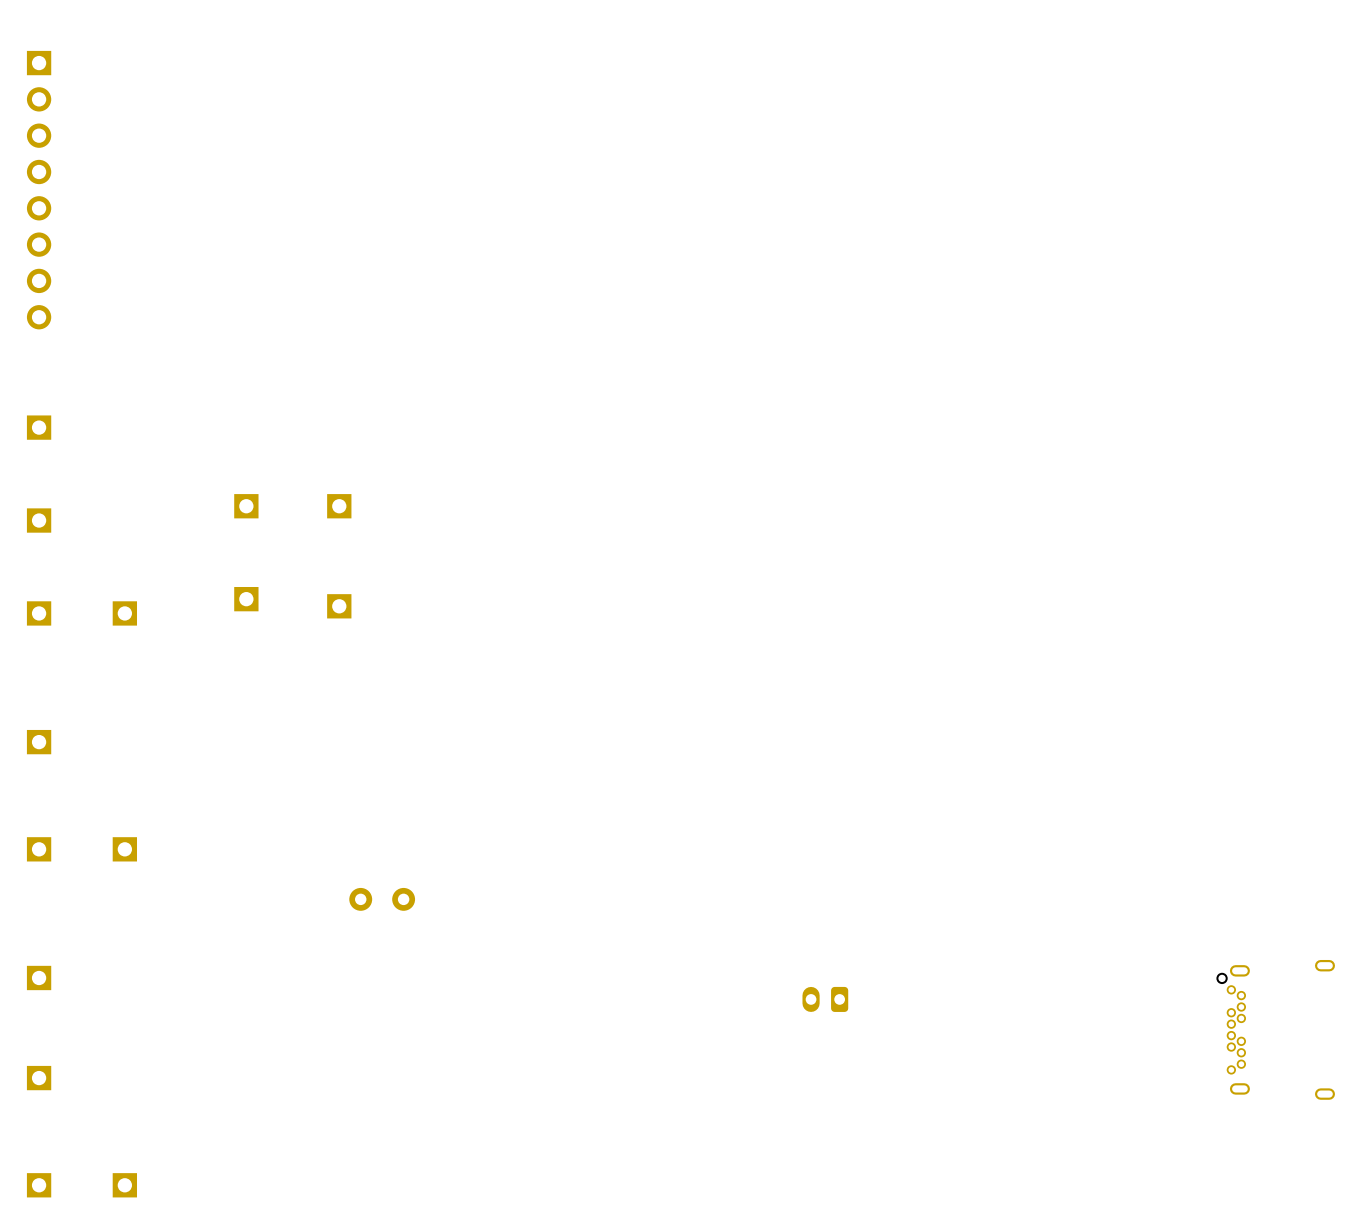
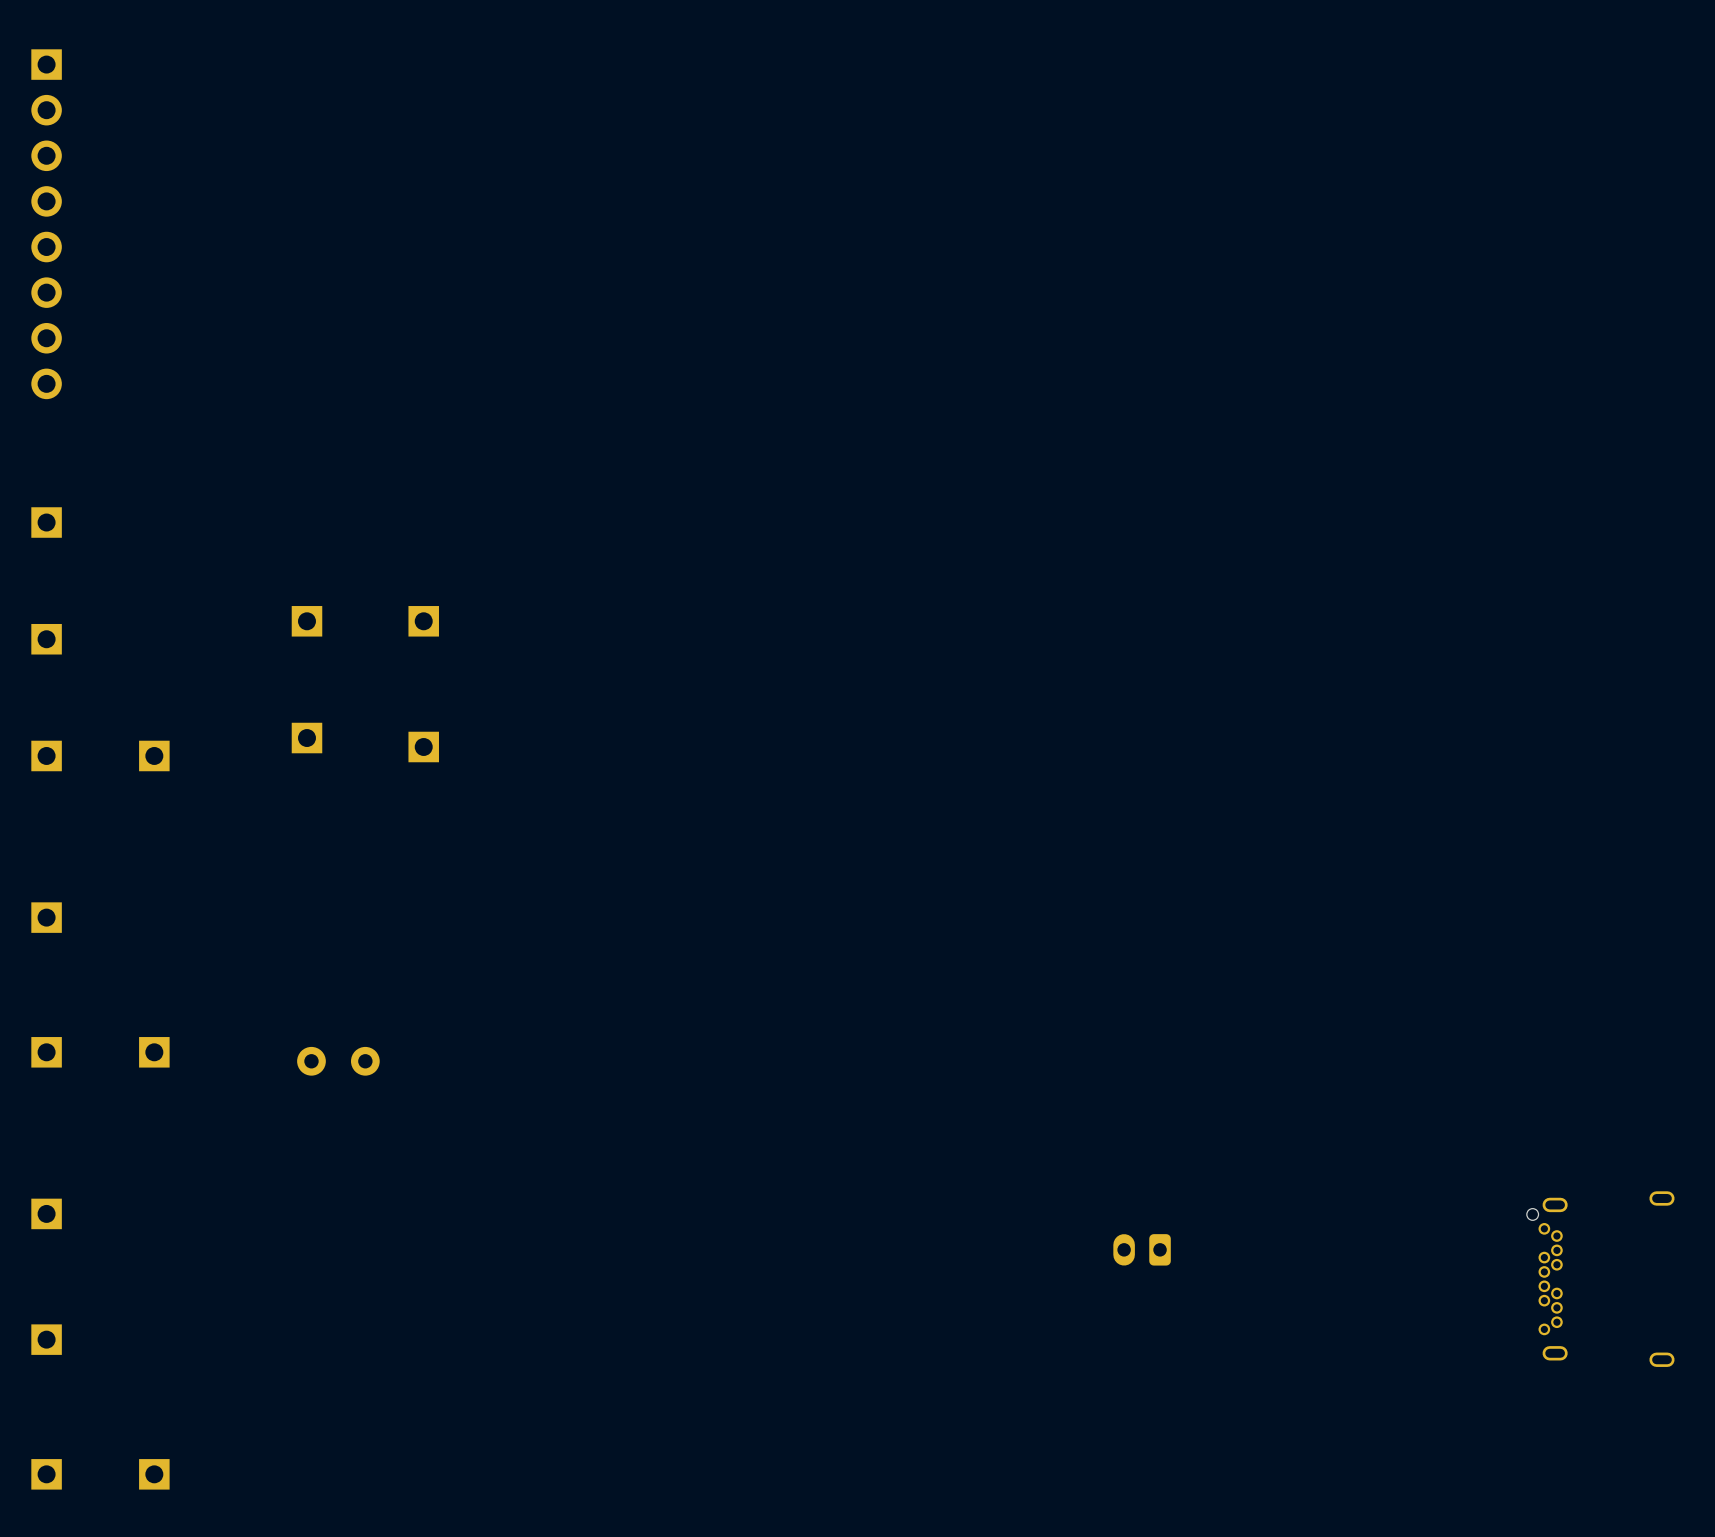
part position: (382, 899) -> (338, 1061)
part position: (825, 999) -> (1142, 1249)

